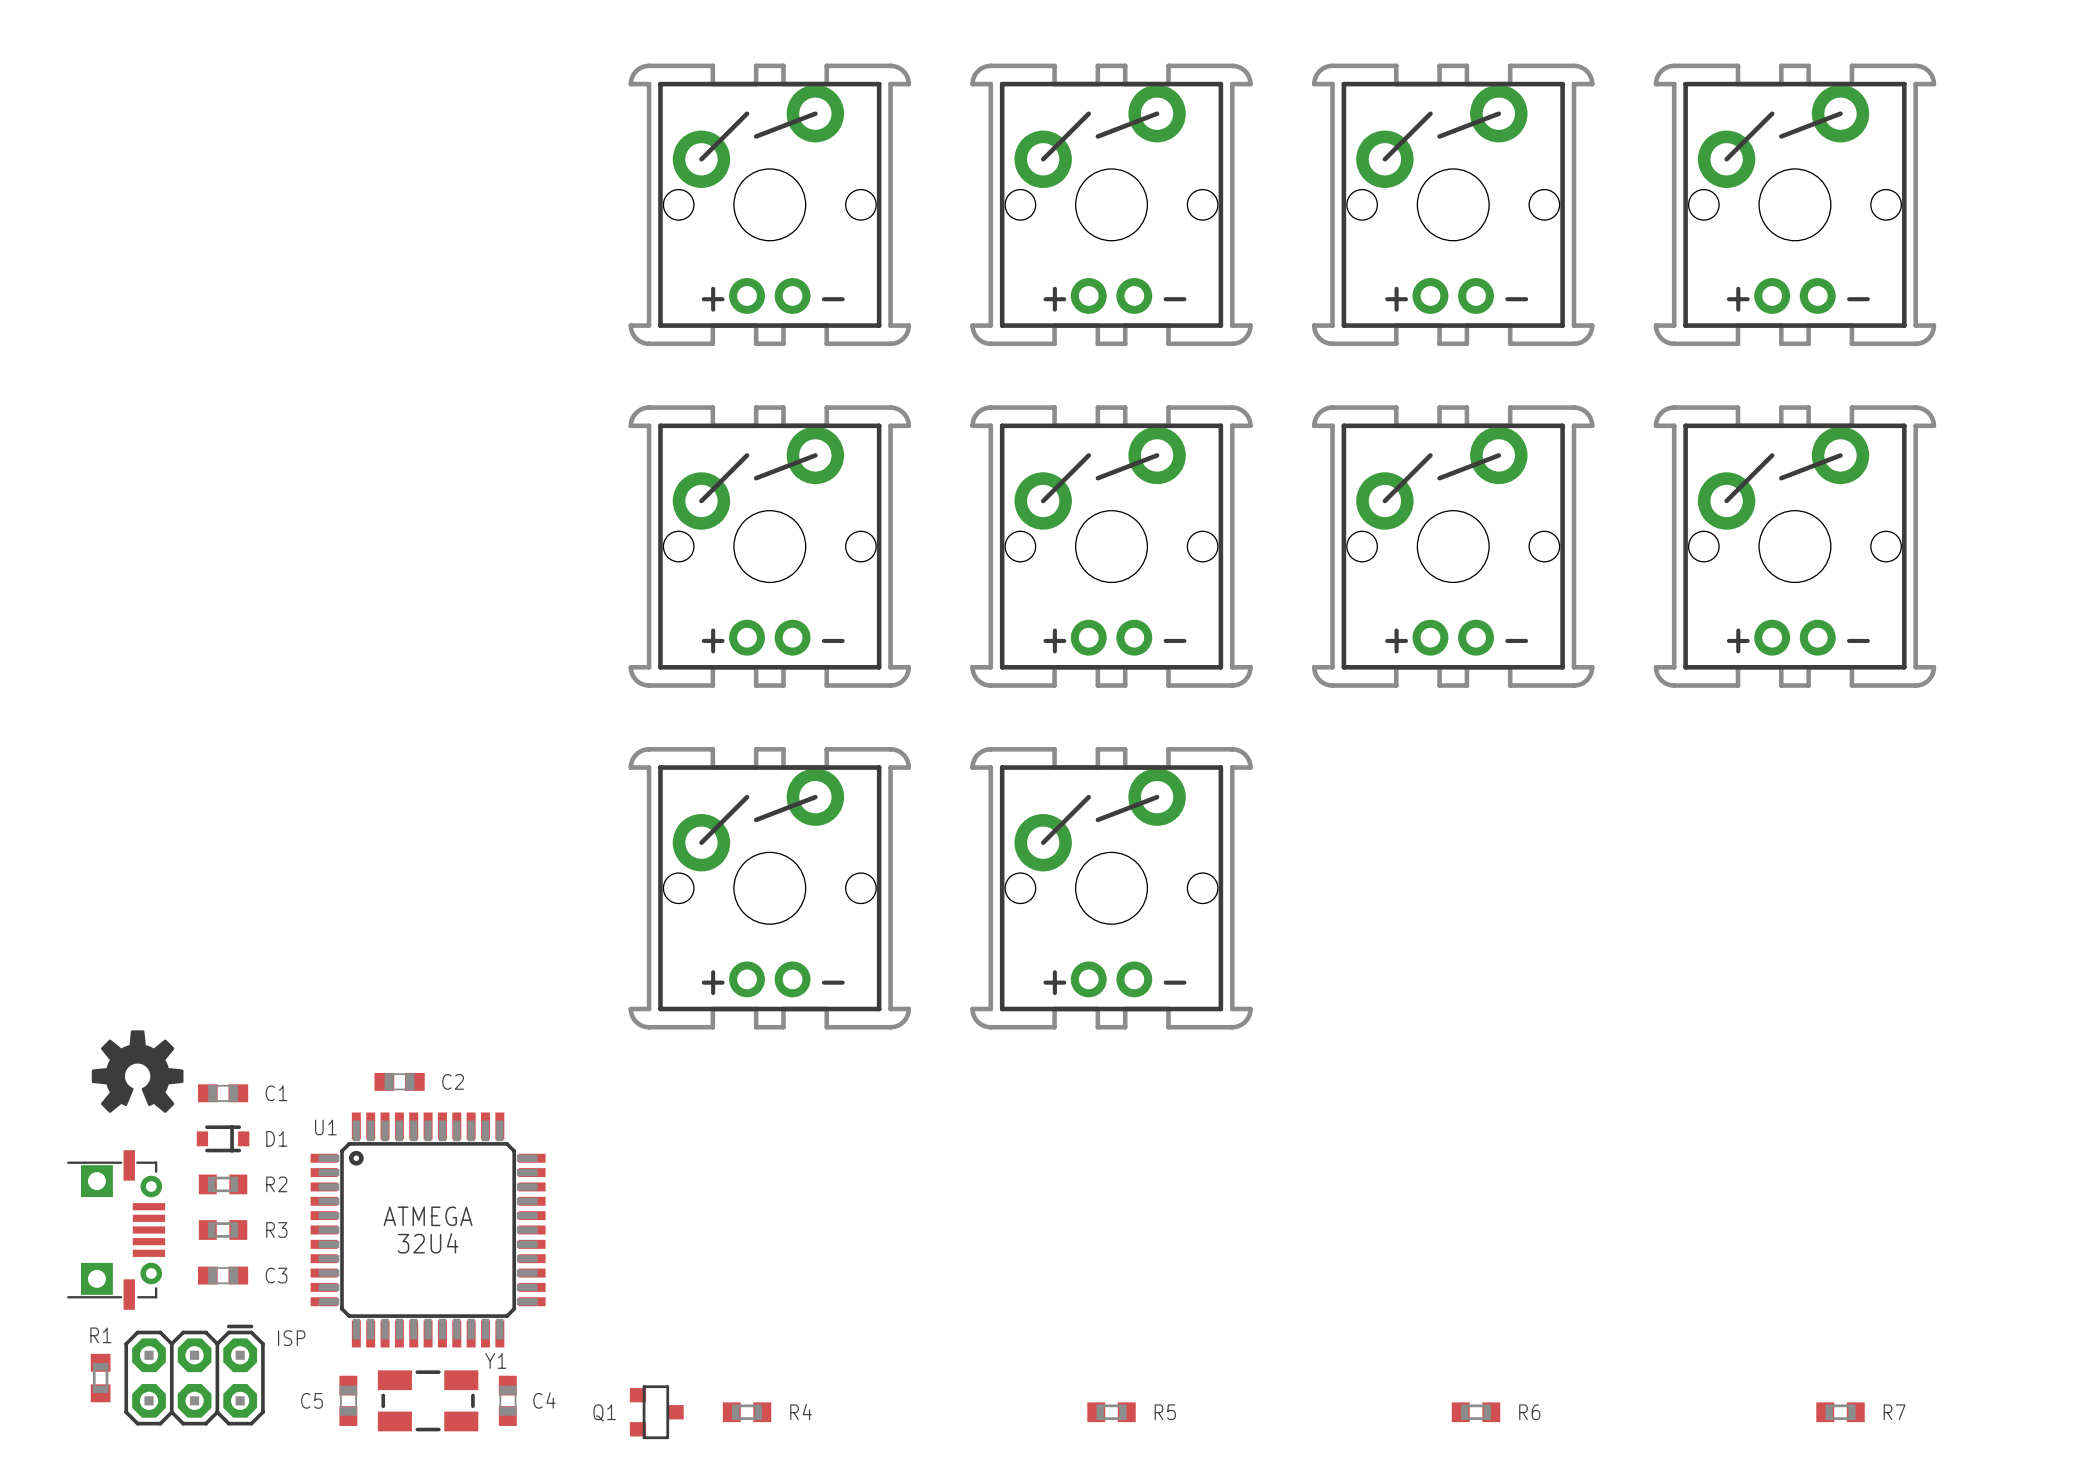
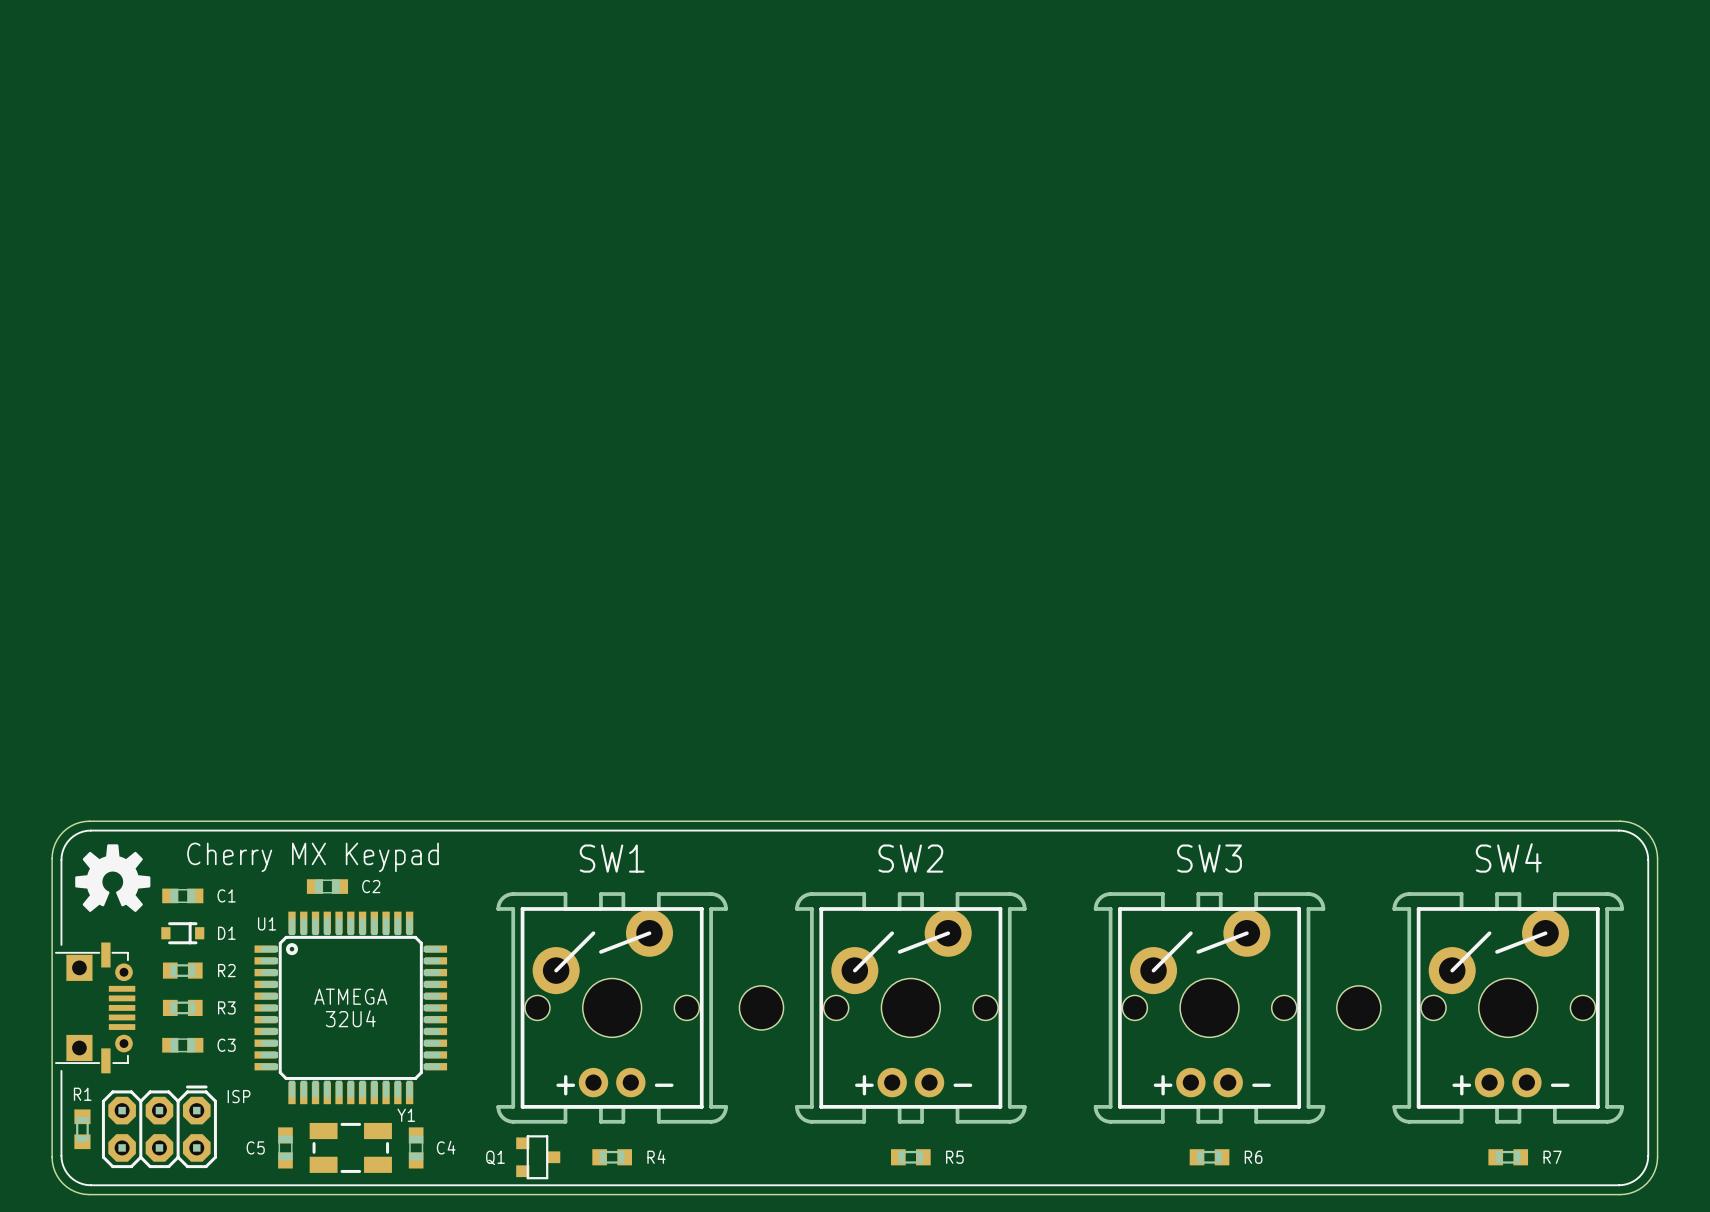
part: (769, 204) -> none
part: (1111, 204) -> none
part: (1453, 204) -> none
part: (1794, 204) -> none
part: (769, 546) -> none
part: (1111, 546) -> none
part: (1453, 546) -> none
part: (1794, 546) -> none
part: (769, 888) -> none
part: (1111, 888) -> none
board edge: none -> (89, 821) (1629, 822) (1646, 832) (1654, 844) (1657, 853) (1656, 1166) (1649, 1179) (1642, 1186) (1629, 1193) (1620, 1194) (79, 1193) (63, 1183) (54, 1171) (52, 1162) (52, 858) (54, 844) (63, 832) (75, 824) (89, 821)
text: none -> Cherry MX Keypad (313, 857)
text: none -> SW4 (1508, 857)
text: none -> SW1 (612, 858)
text: none -> SW2 (910, 858)
text: none -> SW3 (1209, 858)
line: none -> (61, 944) (62, 852) (72, 836) (90, 830) (1618, 830) (1630, 832) (1639, 839) (1646, 848) (1648, 859) (1647, 1159) (1639, 1176) (1622, 1185) (87, 1185) (70, 1176) (62, 1163) (61, 1070)
part: none -> (612, 1007)
hole: none -> (761, 1007)
part: none -> (910, 1007)
part: none -> (1209, 1007)
hole: none -> (1358, 1007)
part: none -> (1508, 1007)

